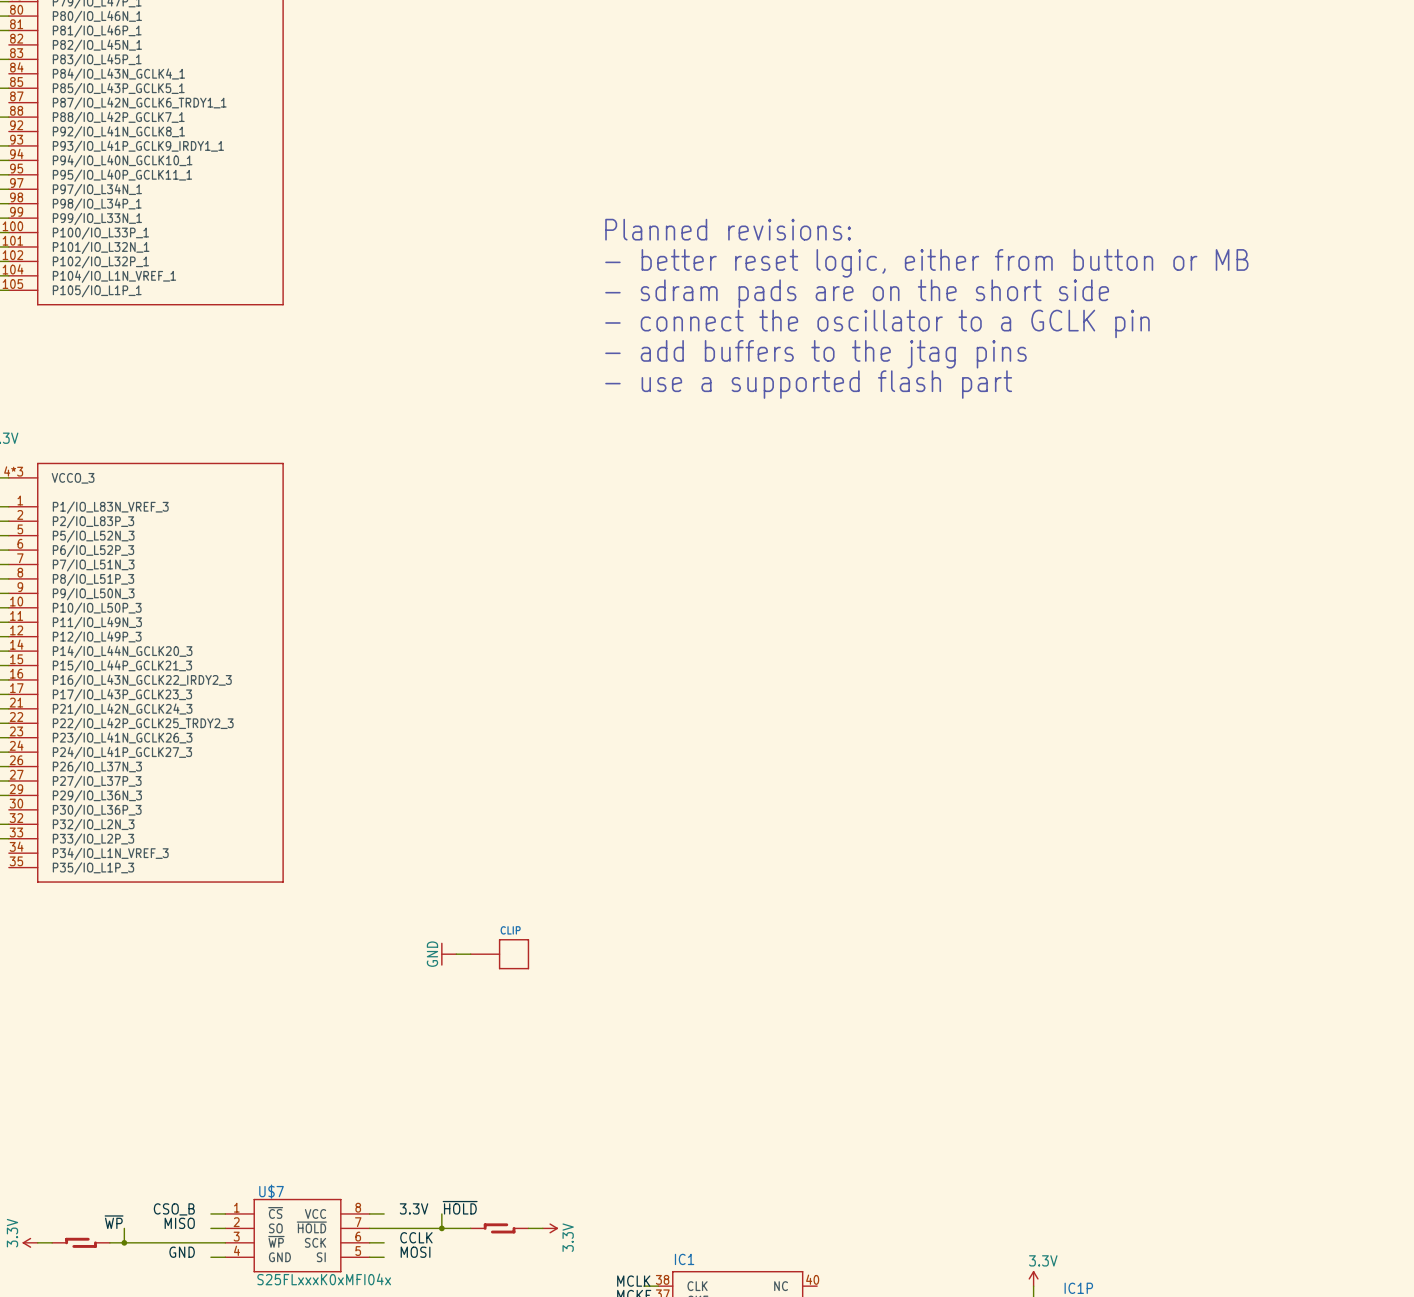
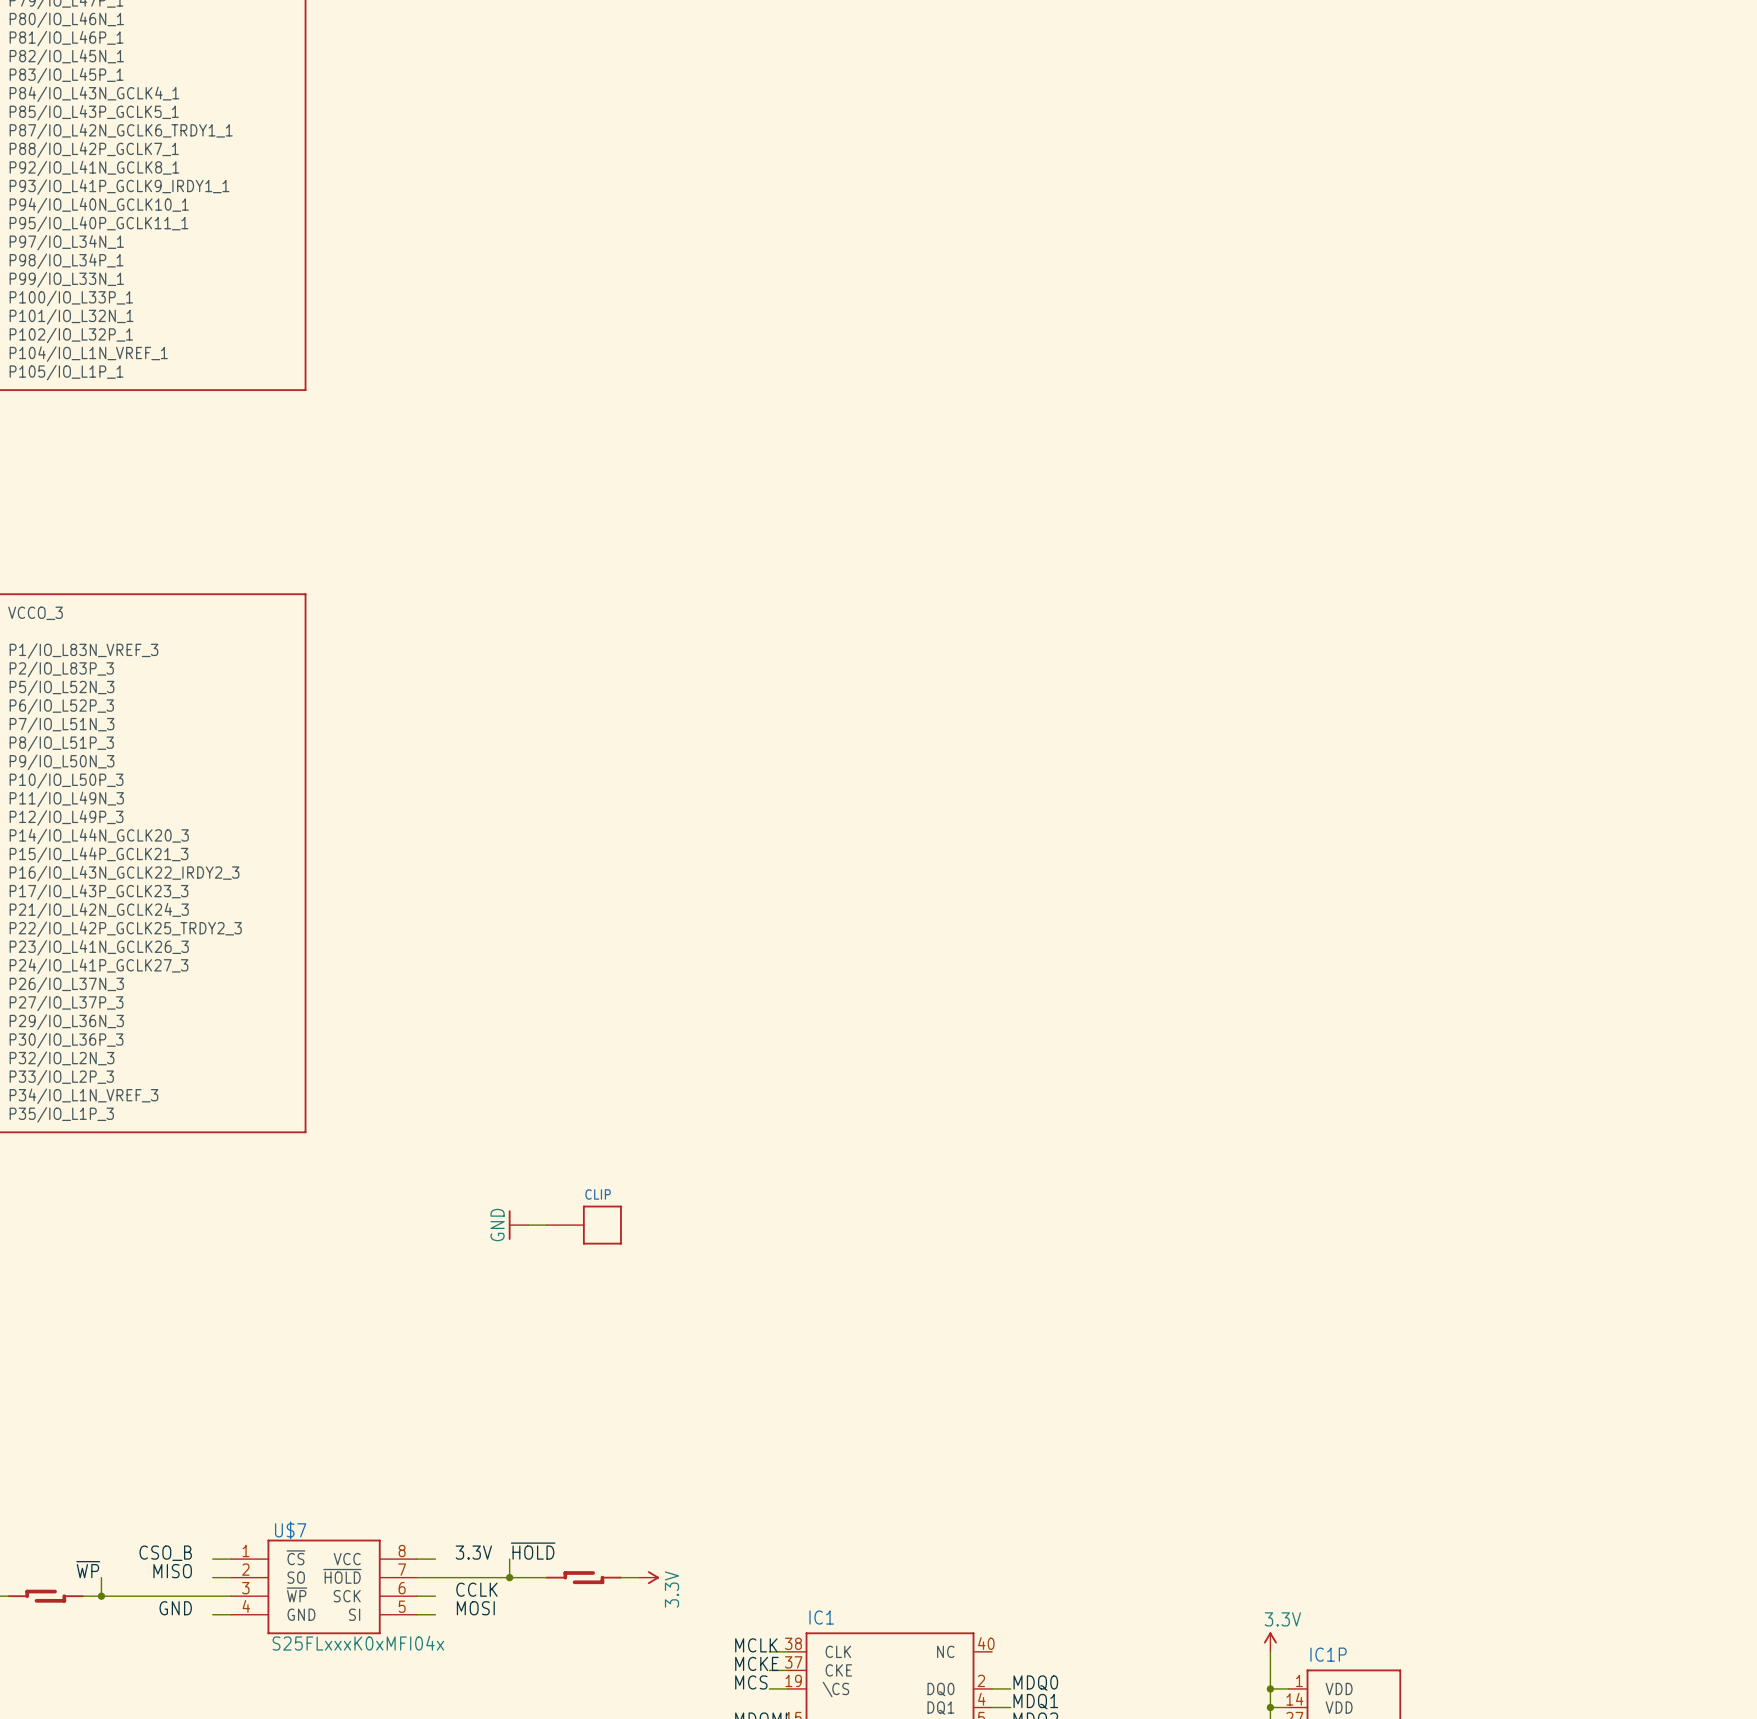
text: Planned revisions: (728, 229) -> none
text: - better reset logic, either from button or MB (926, 263) -> none
text: - sdram pads are on the short side (857, 293) -> none
text: - connect the oscillator to a GCLK pin (877, 323) -> none
text: - add buffers to the jtag pins (816, 354) -> none
text: - use a supported flash part (808, 384) -> none

